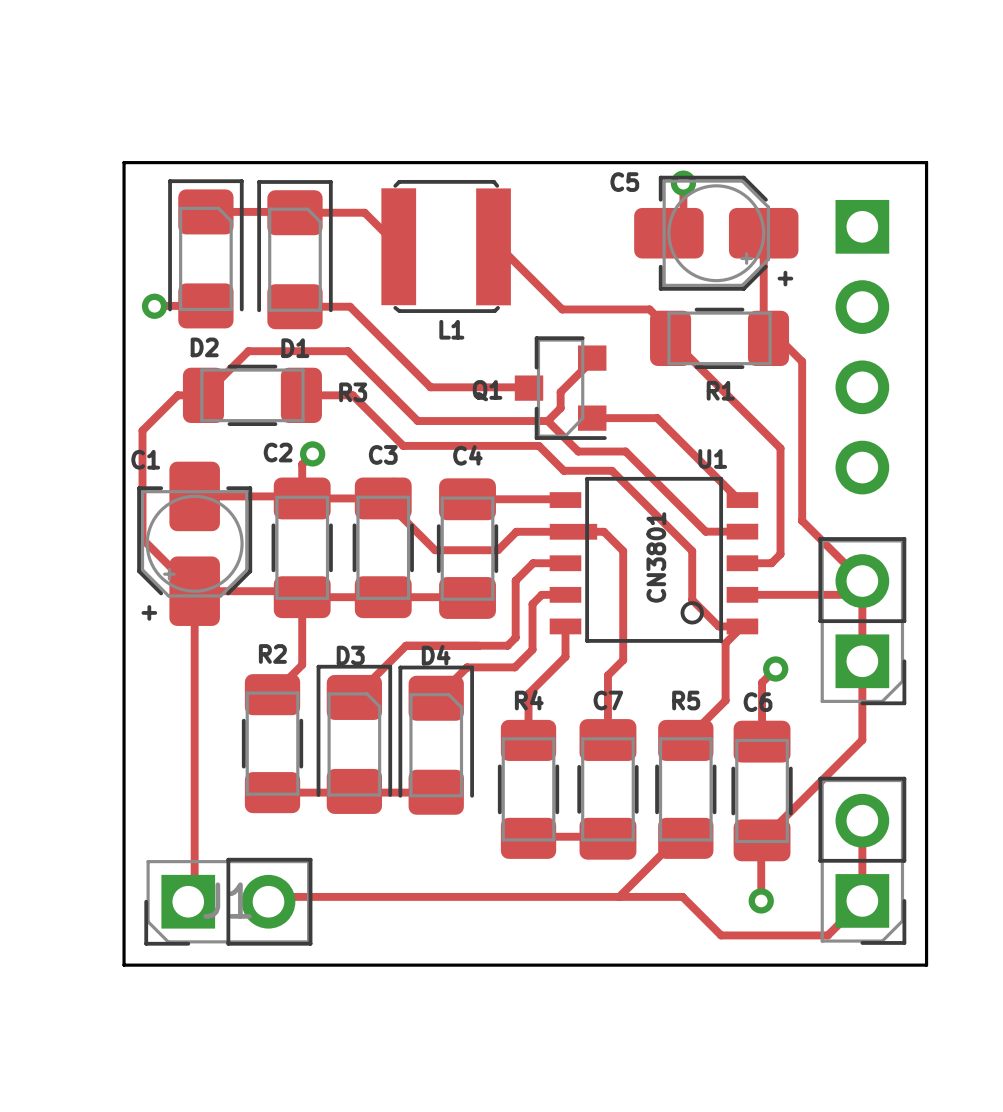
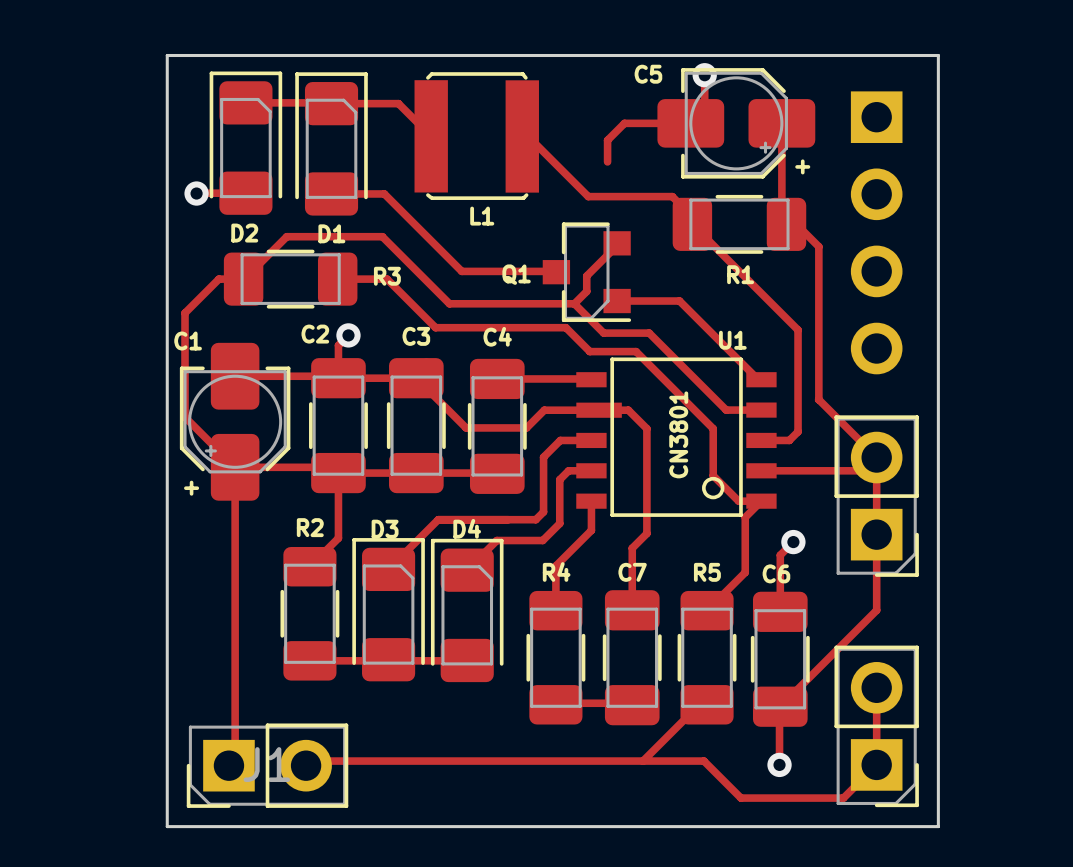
track: none -> (690, 123) (624, 123) (607, 140) (607, 161)

